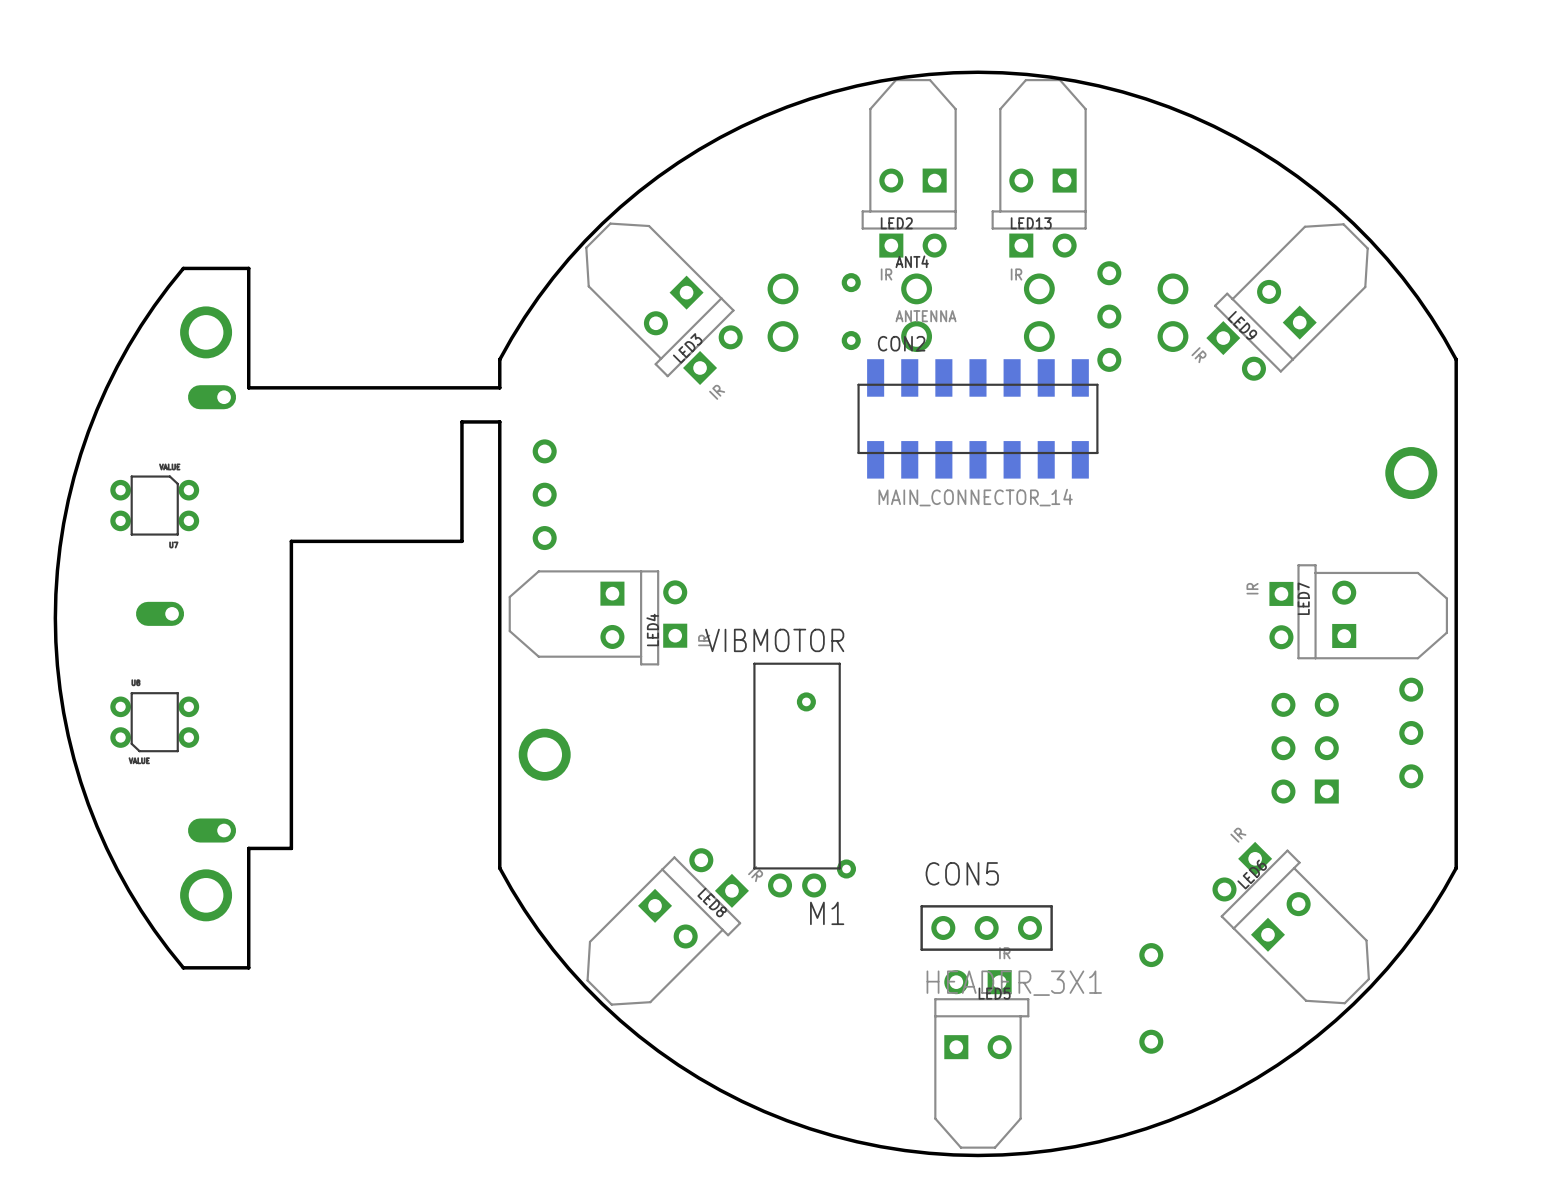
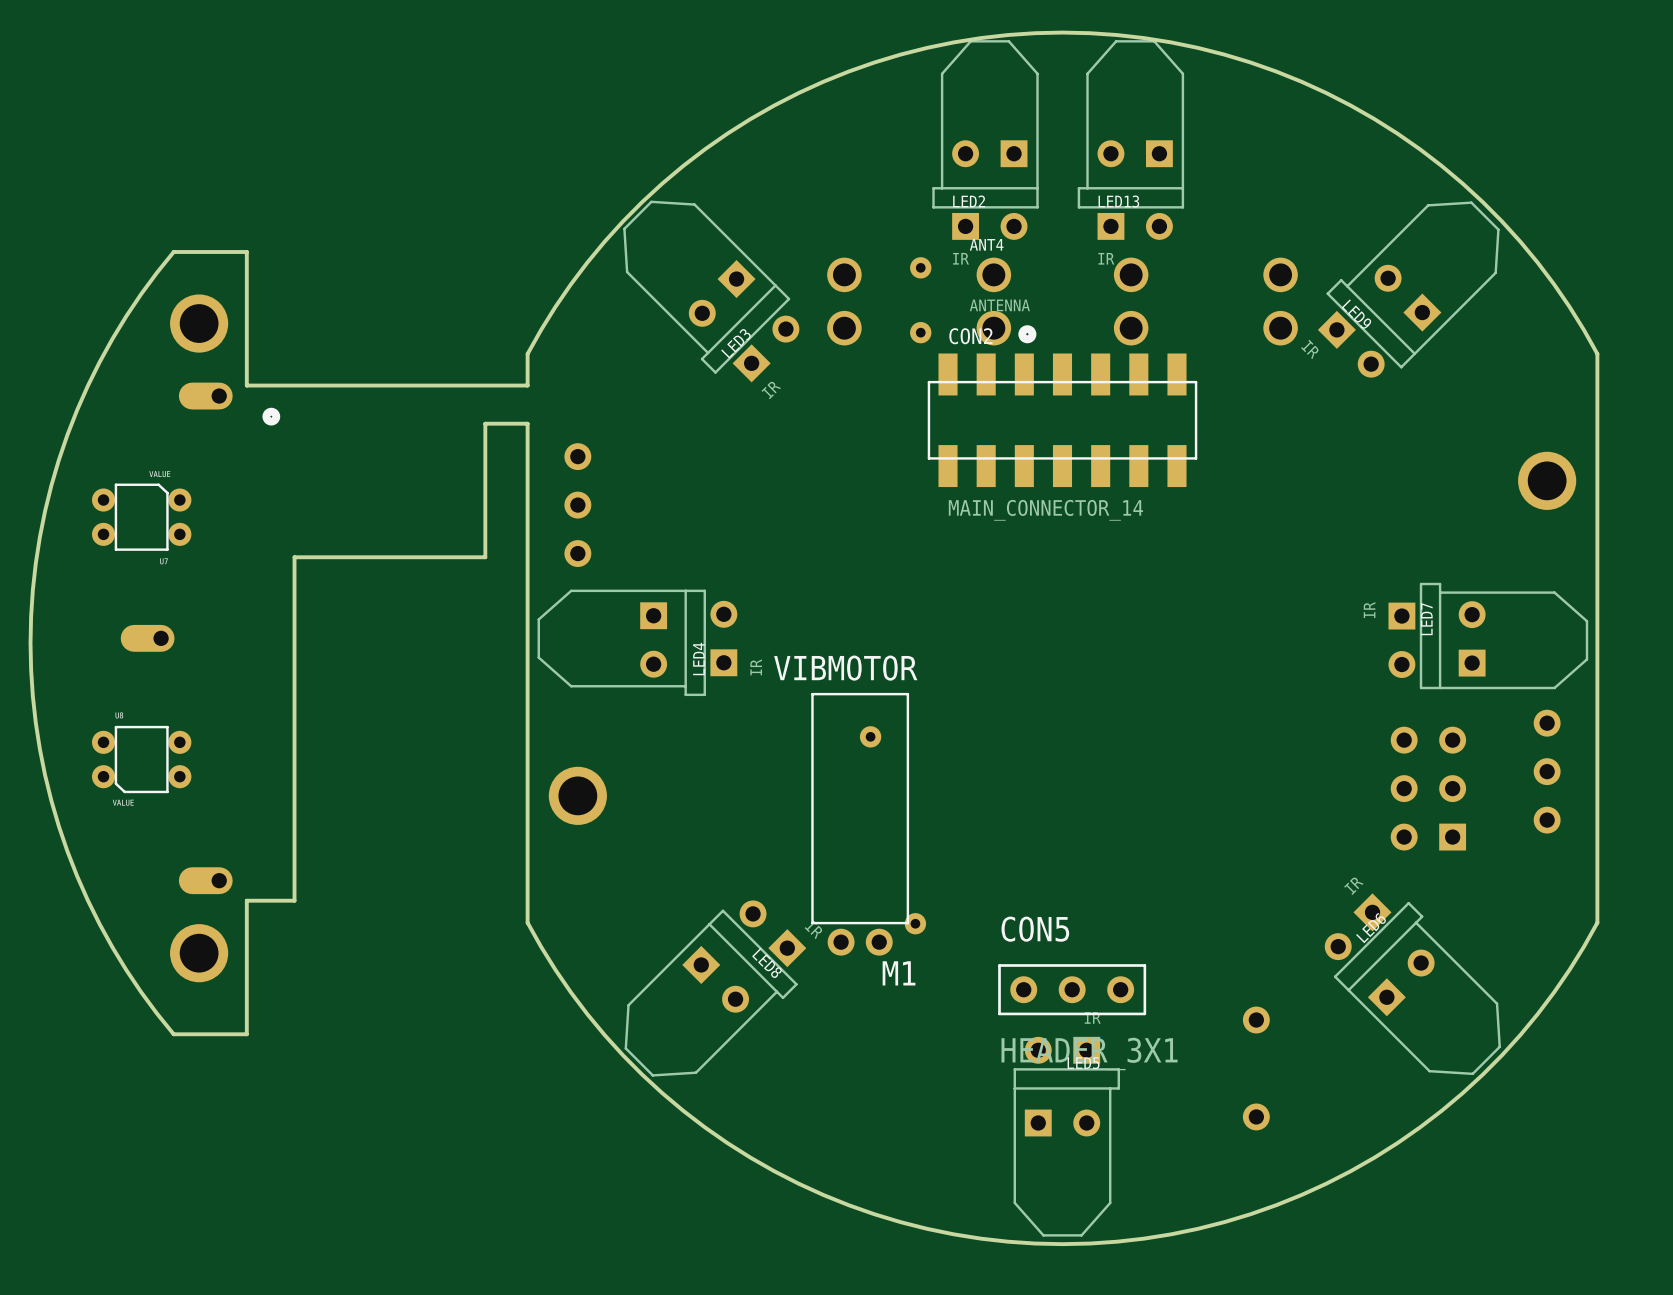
part: (1109, 316) -> none
drawing: none -> [1018, 325, 1037, 344]
drawing: none -> [262, 407, 281, 426]

